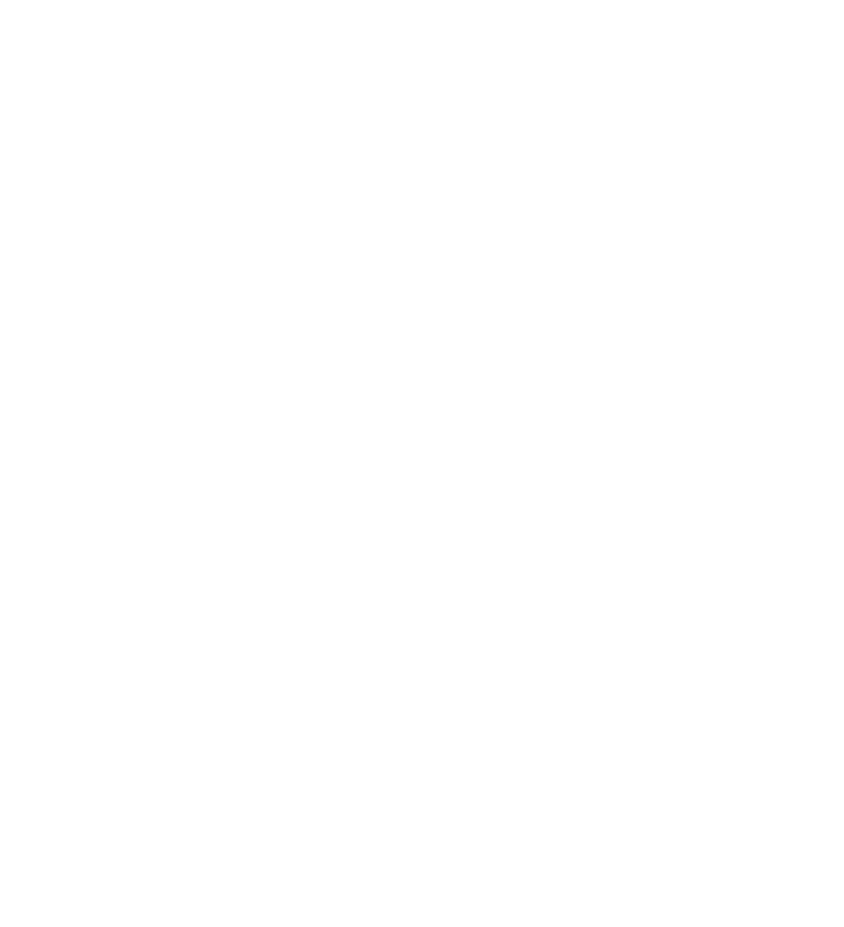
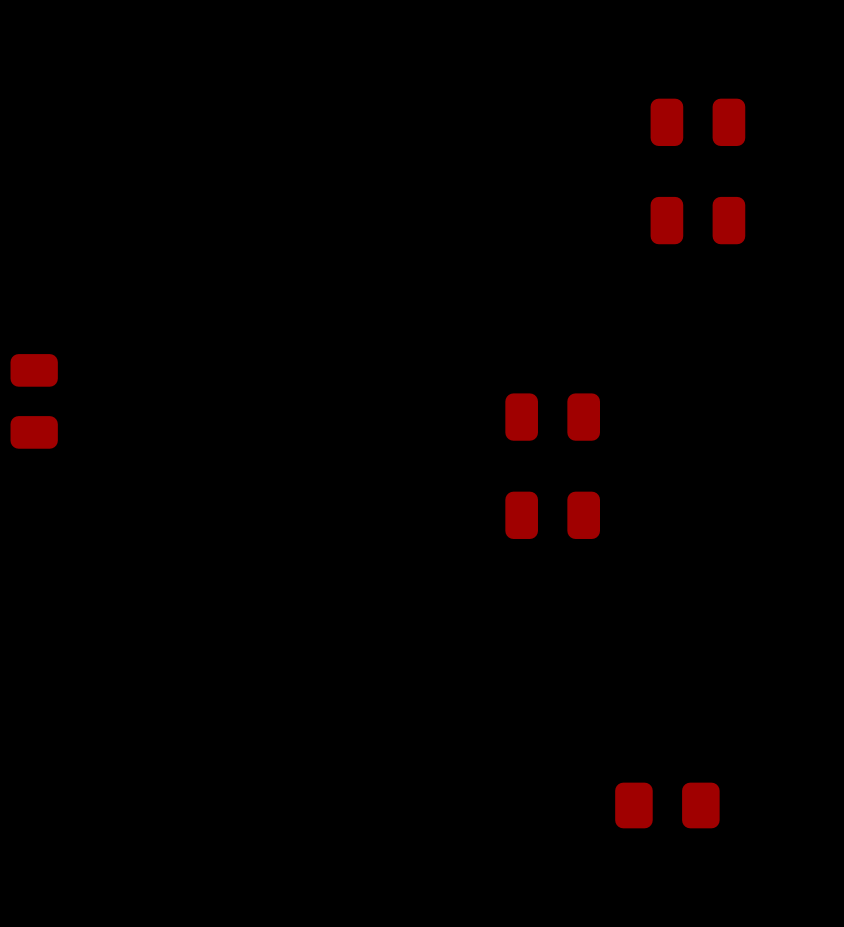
part: none -> (697, 122)
part: none -> (697, 220)
part: none -> (34, 401)
part: none -> (552, 417)
part: none -> (552, 515)
part: none -> (667, 805)

